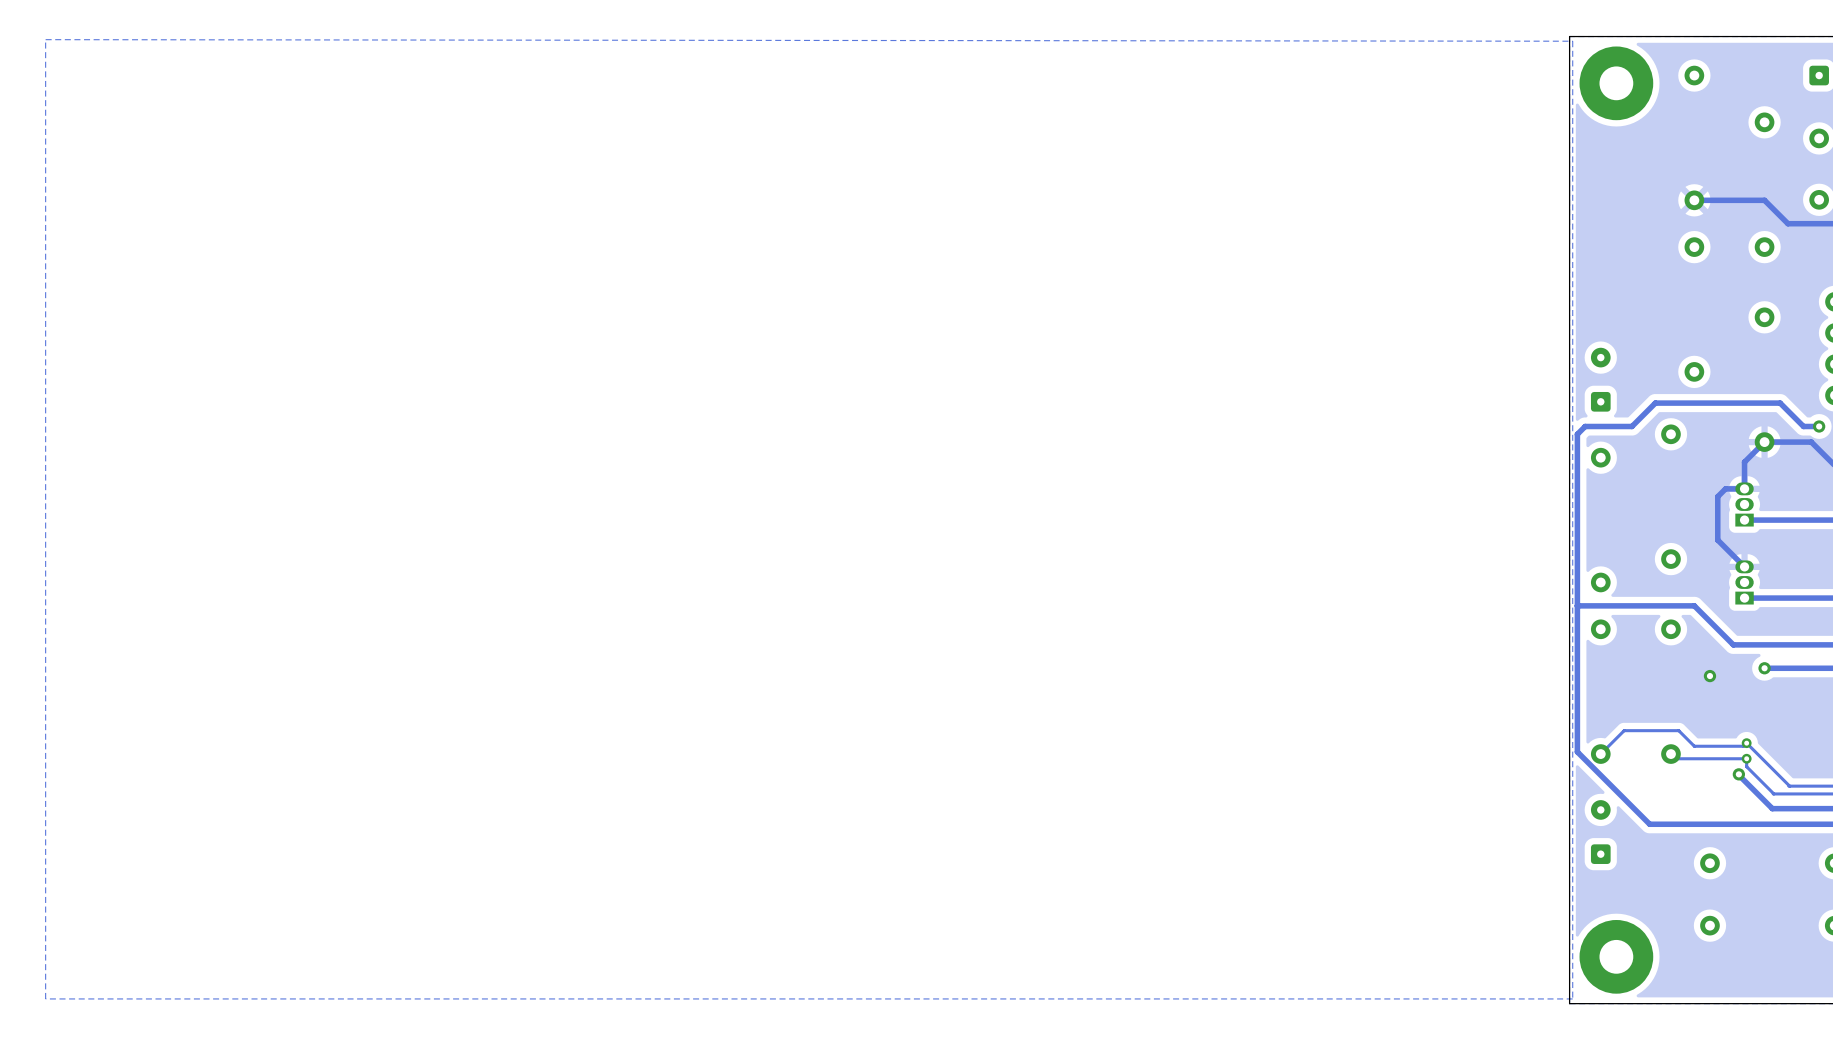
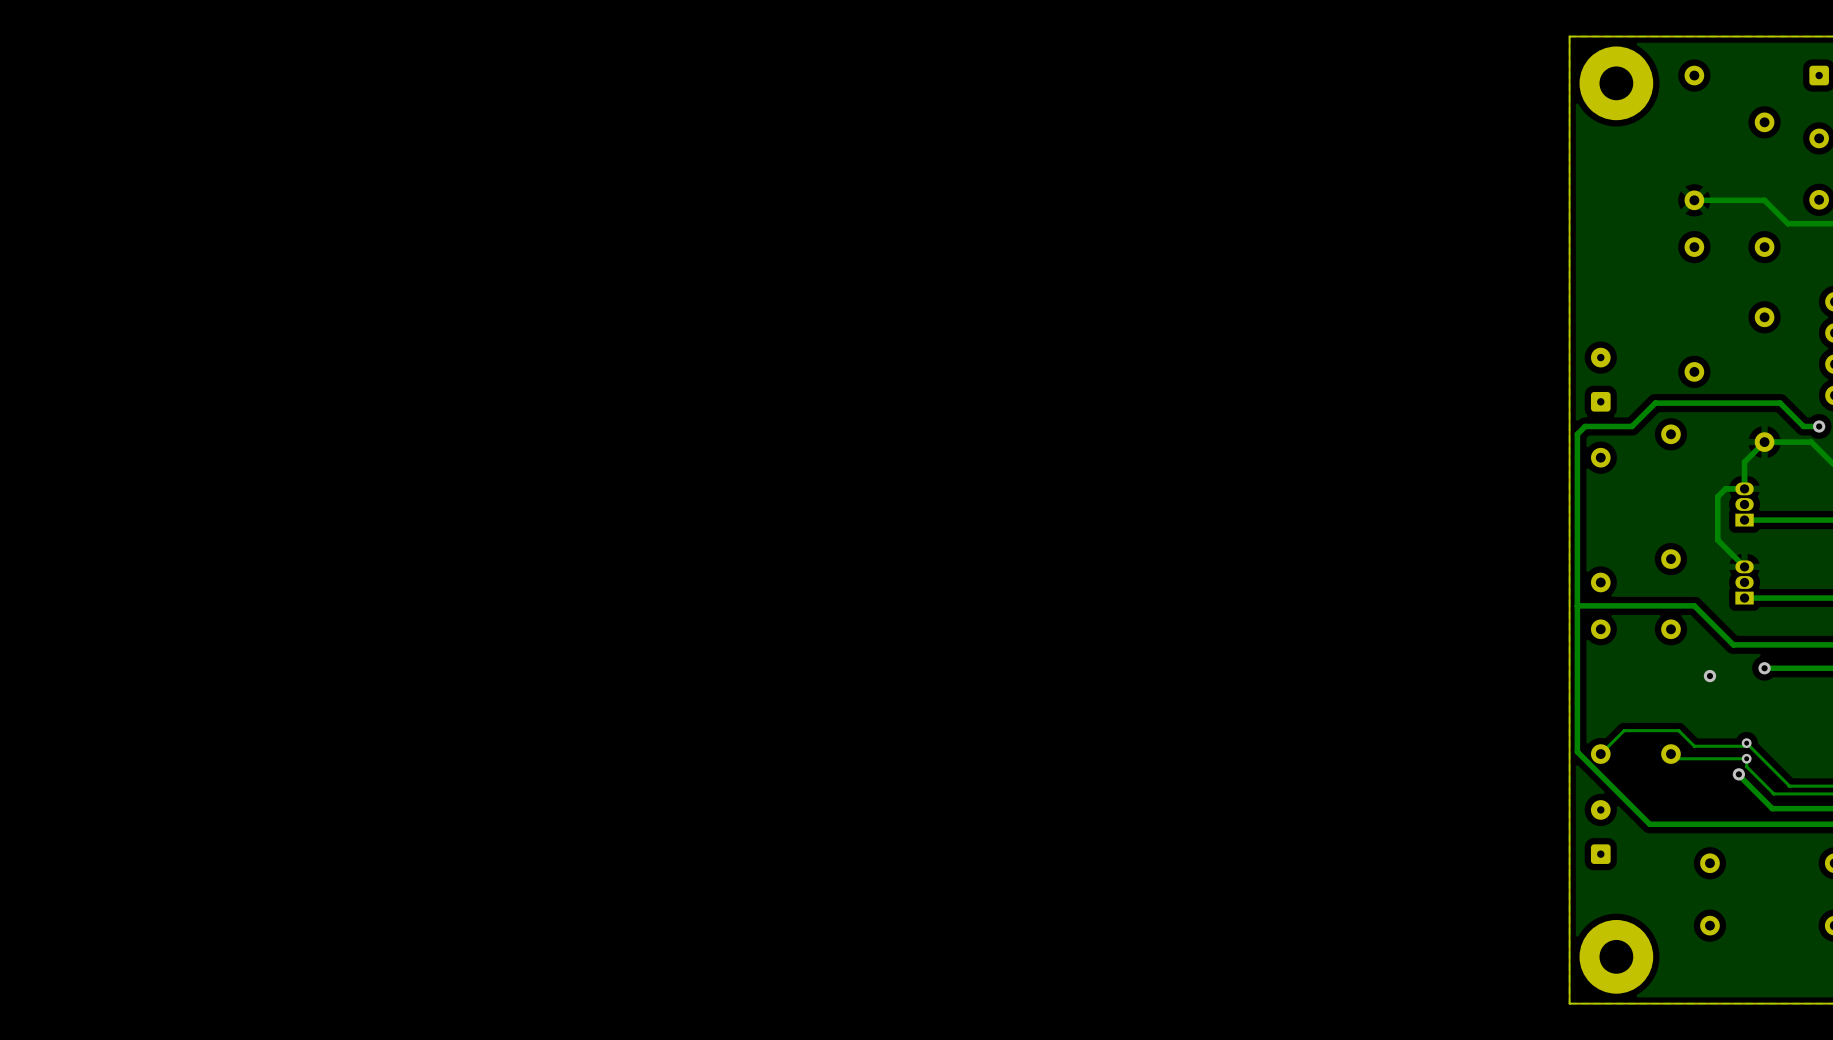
zone outline: (45, 39) (45, 998) (1572, 998) (1572, 41) (45, 39) -> none

